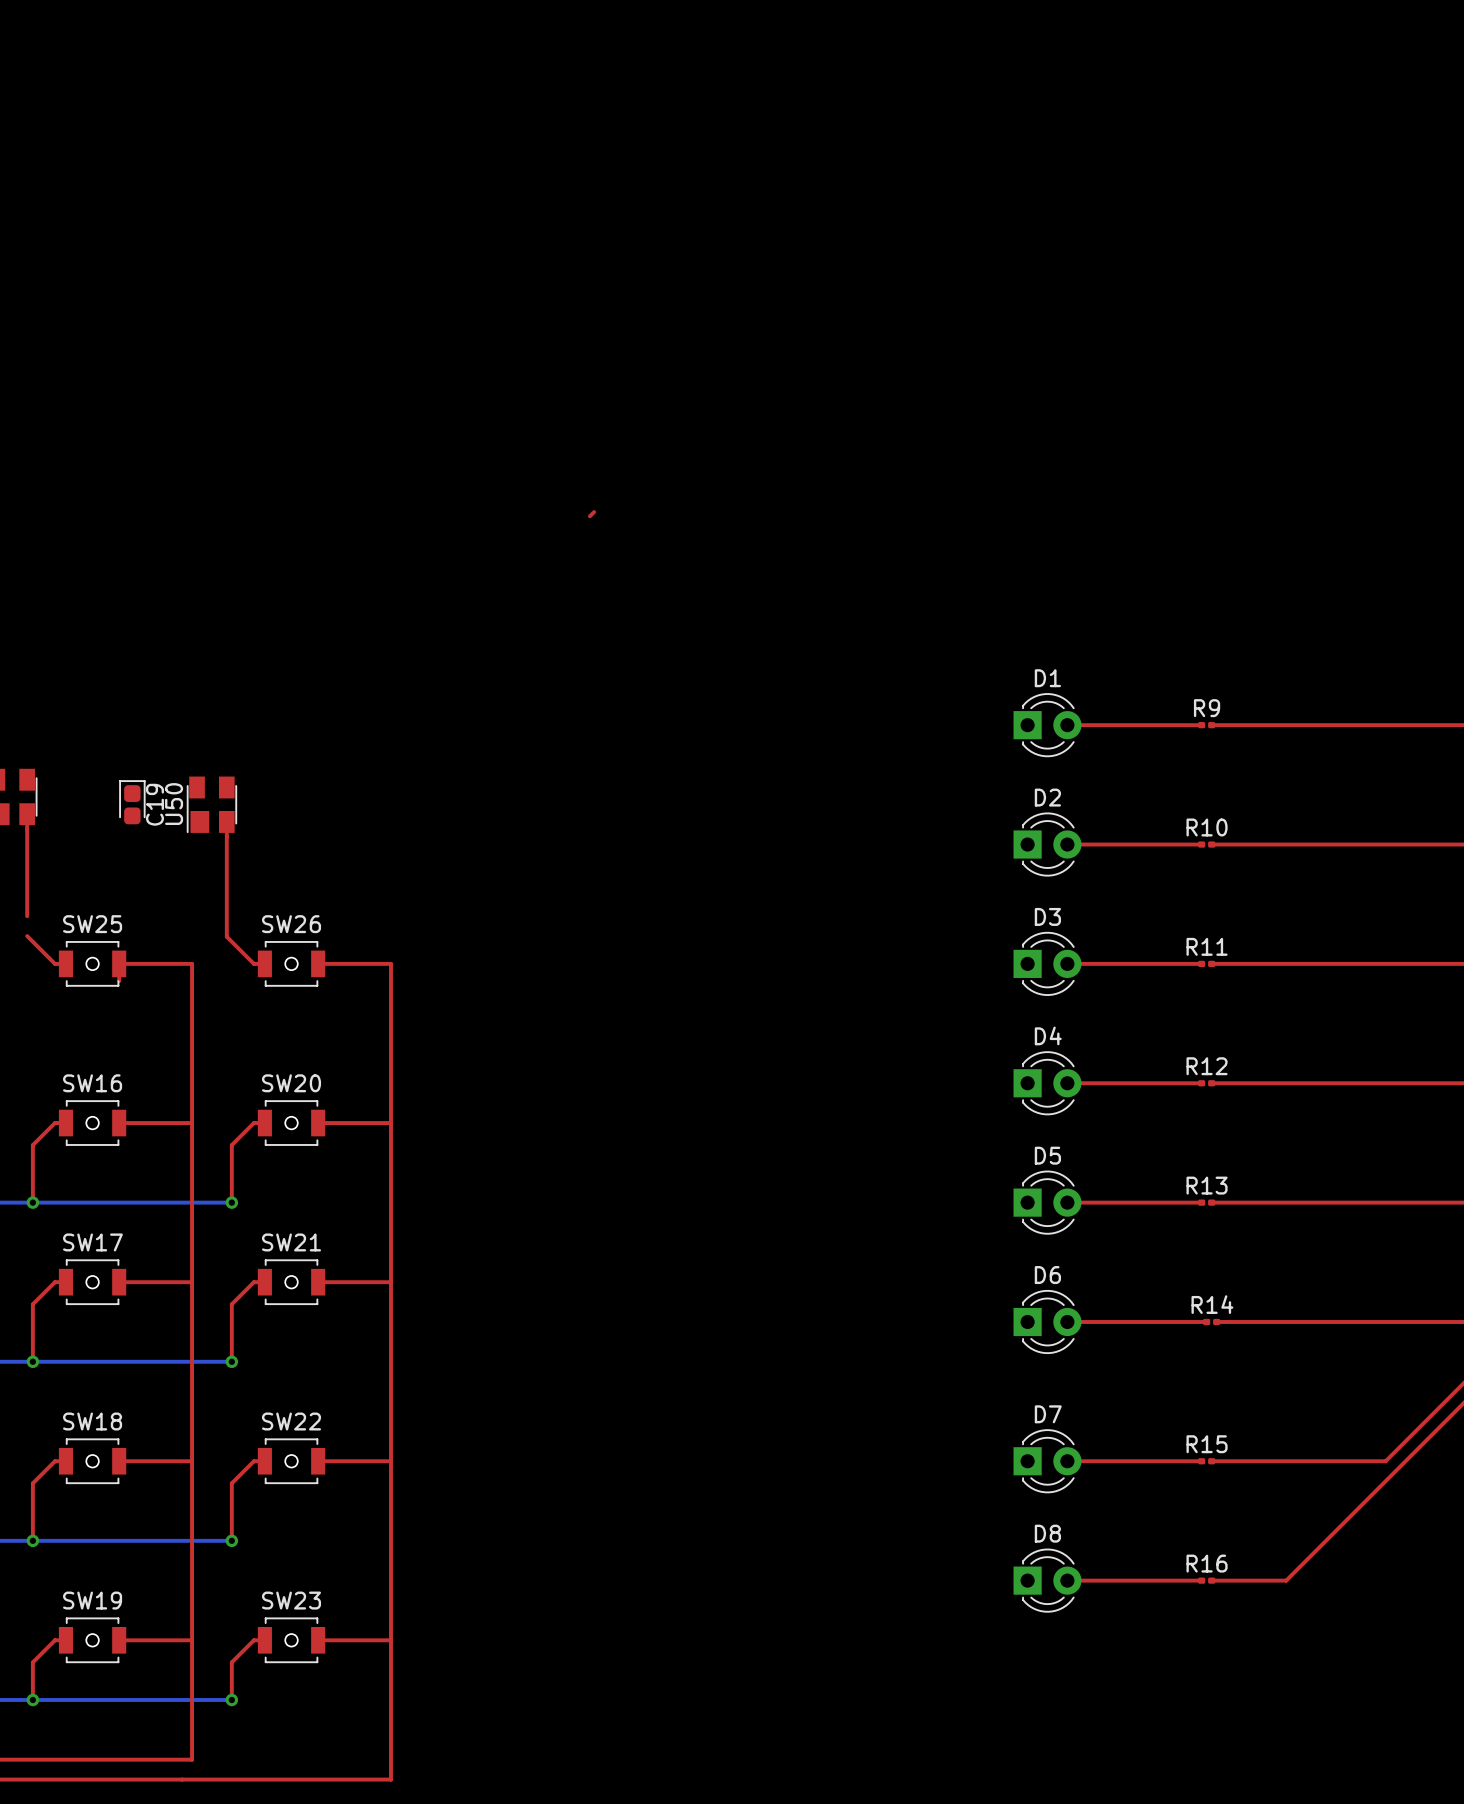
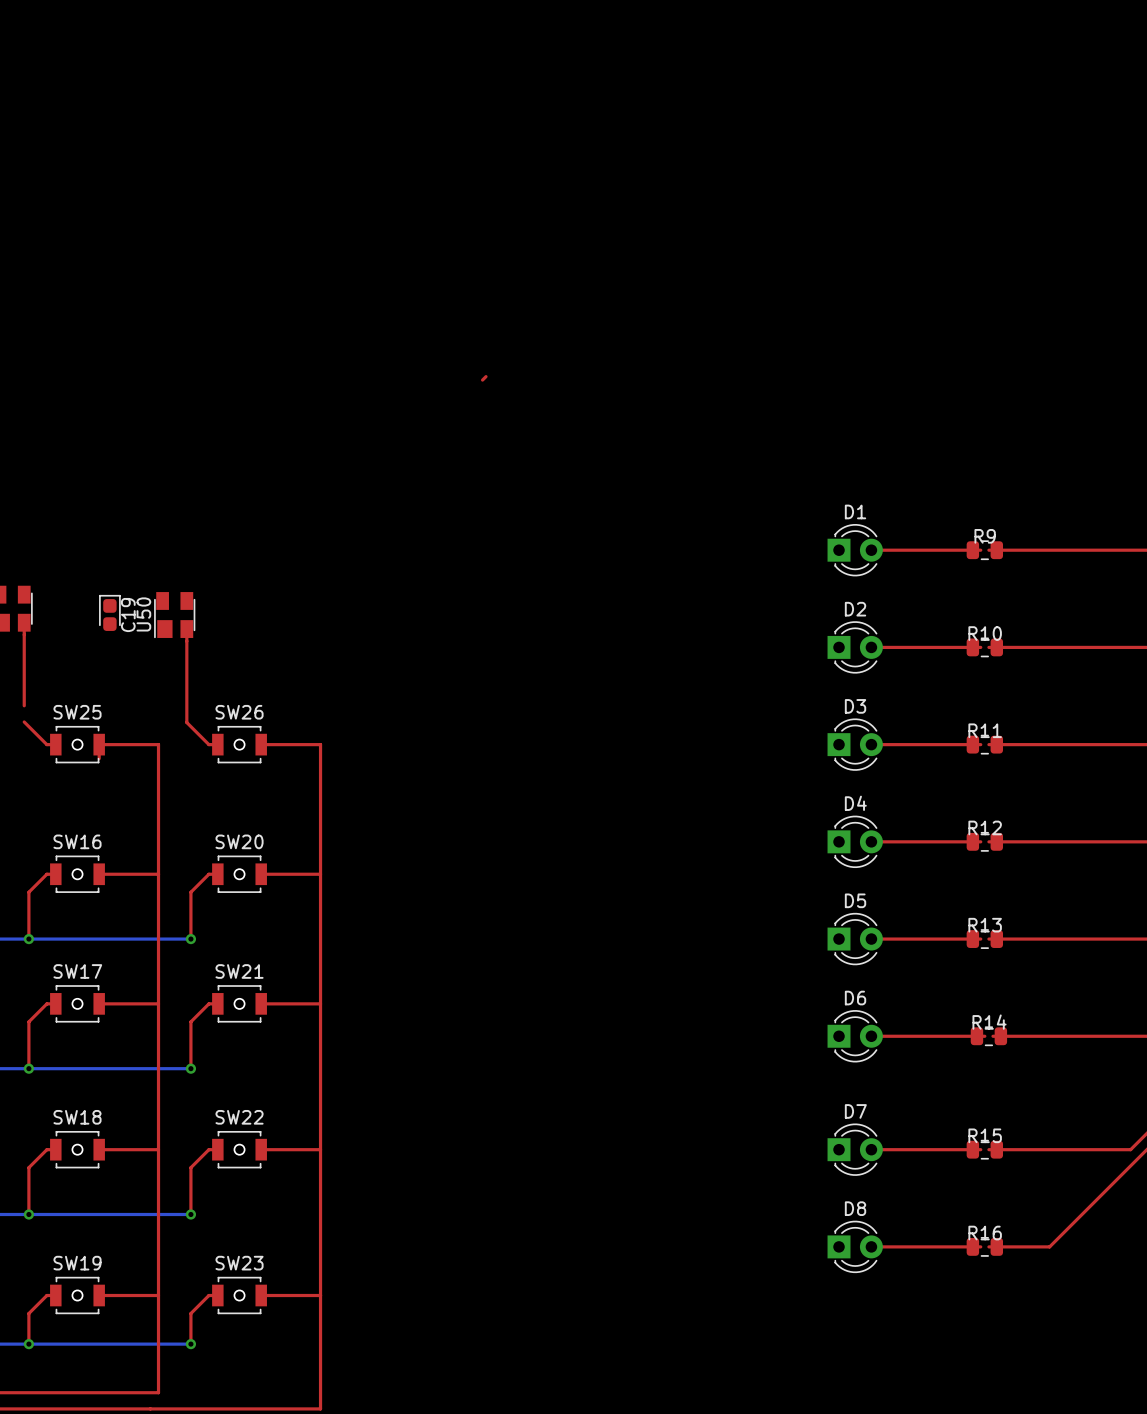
R9 footprint: [1198, 722, 1216, 729] -> [966, 540, 1004, 561]
R10 footprint: [1198, 841, 1216, 848] -> [966, 637, 1004, 658]
R11 footprint: [1198, 960, 1216, 968] -> [966, 734, 1004, 755]
R12 footprint: [1198, 1080, 1216, 1087] -> [966, 832, 1004, 852]
R13 footprint: [1198, 1199, 1216, 1206] -> [966, 929, 1004, 949]
R14 footprint: [1203, 1318, 1221, 1326] -> [970, 1026, 1008, 1047]
R15 footprint: [1198, 1458, 1216, 1465] -> [966, 1139, 1004, 1160]
R16 footprint: [1198, 1577, 1216, 1584] -> [966, 1237, 1004, 1257]

